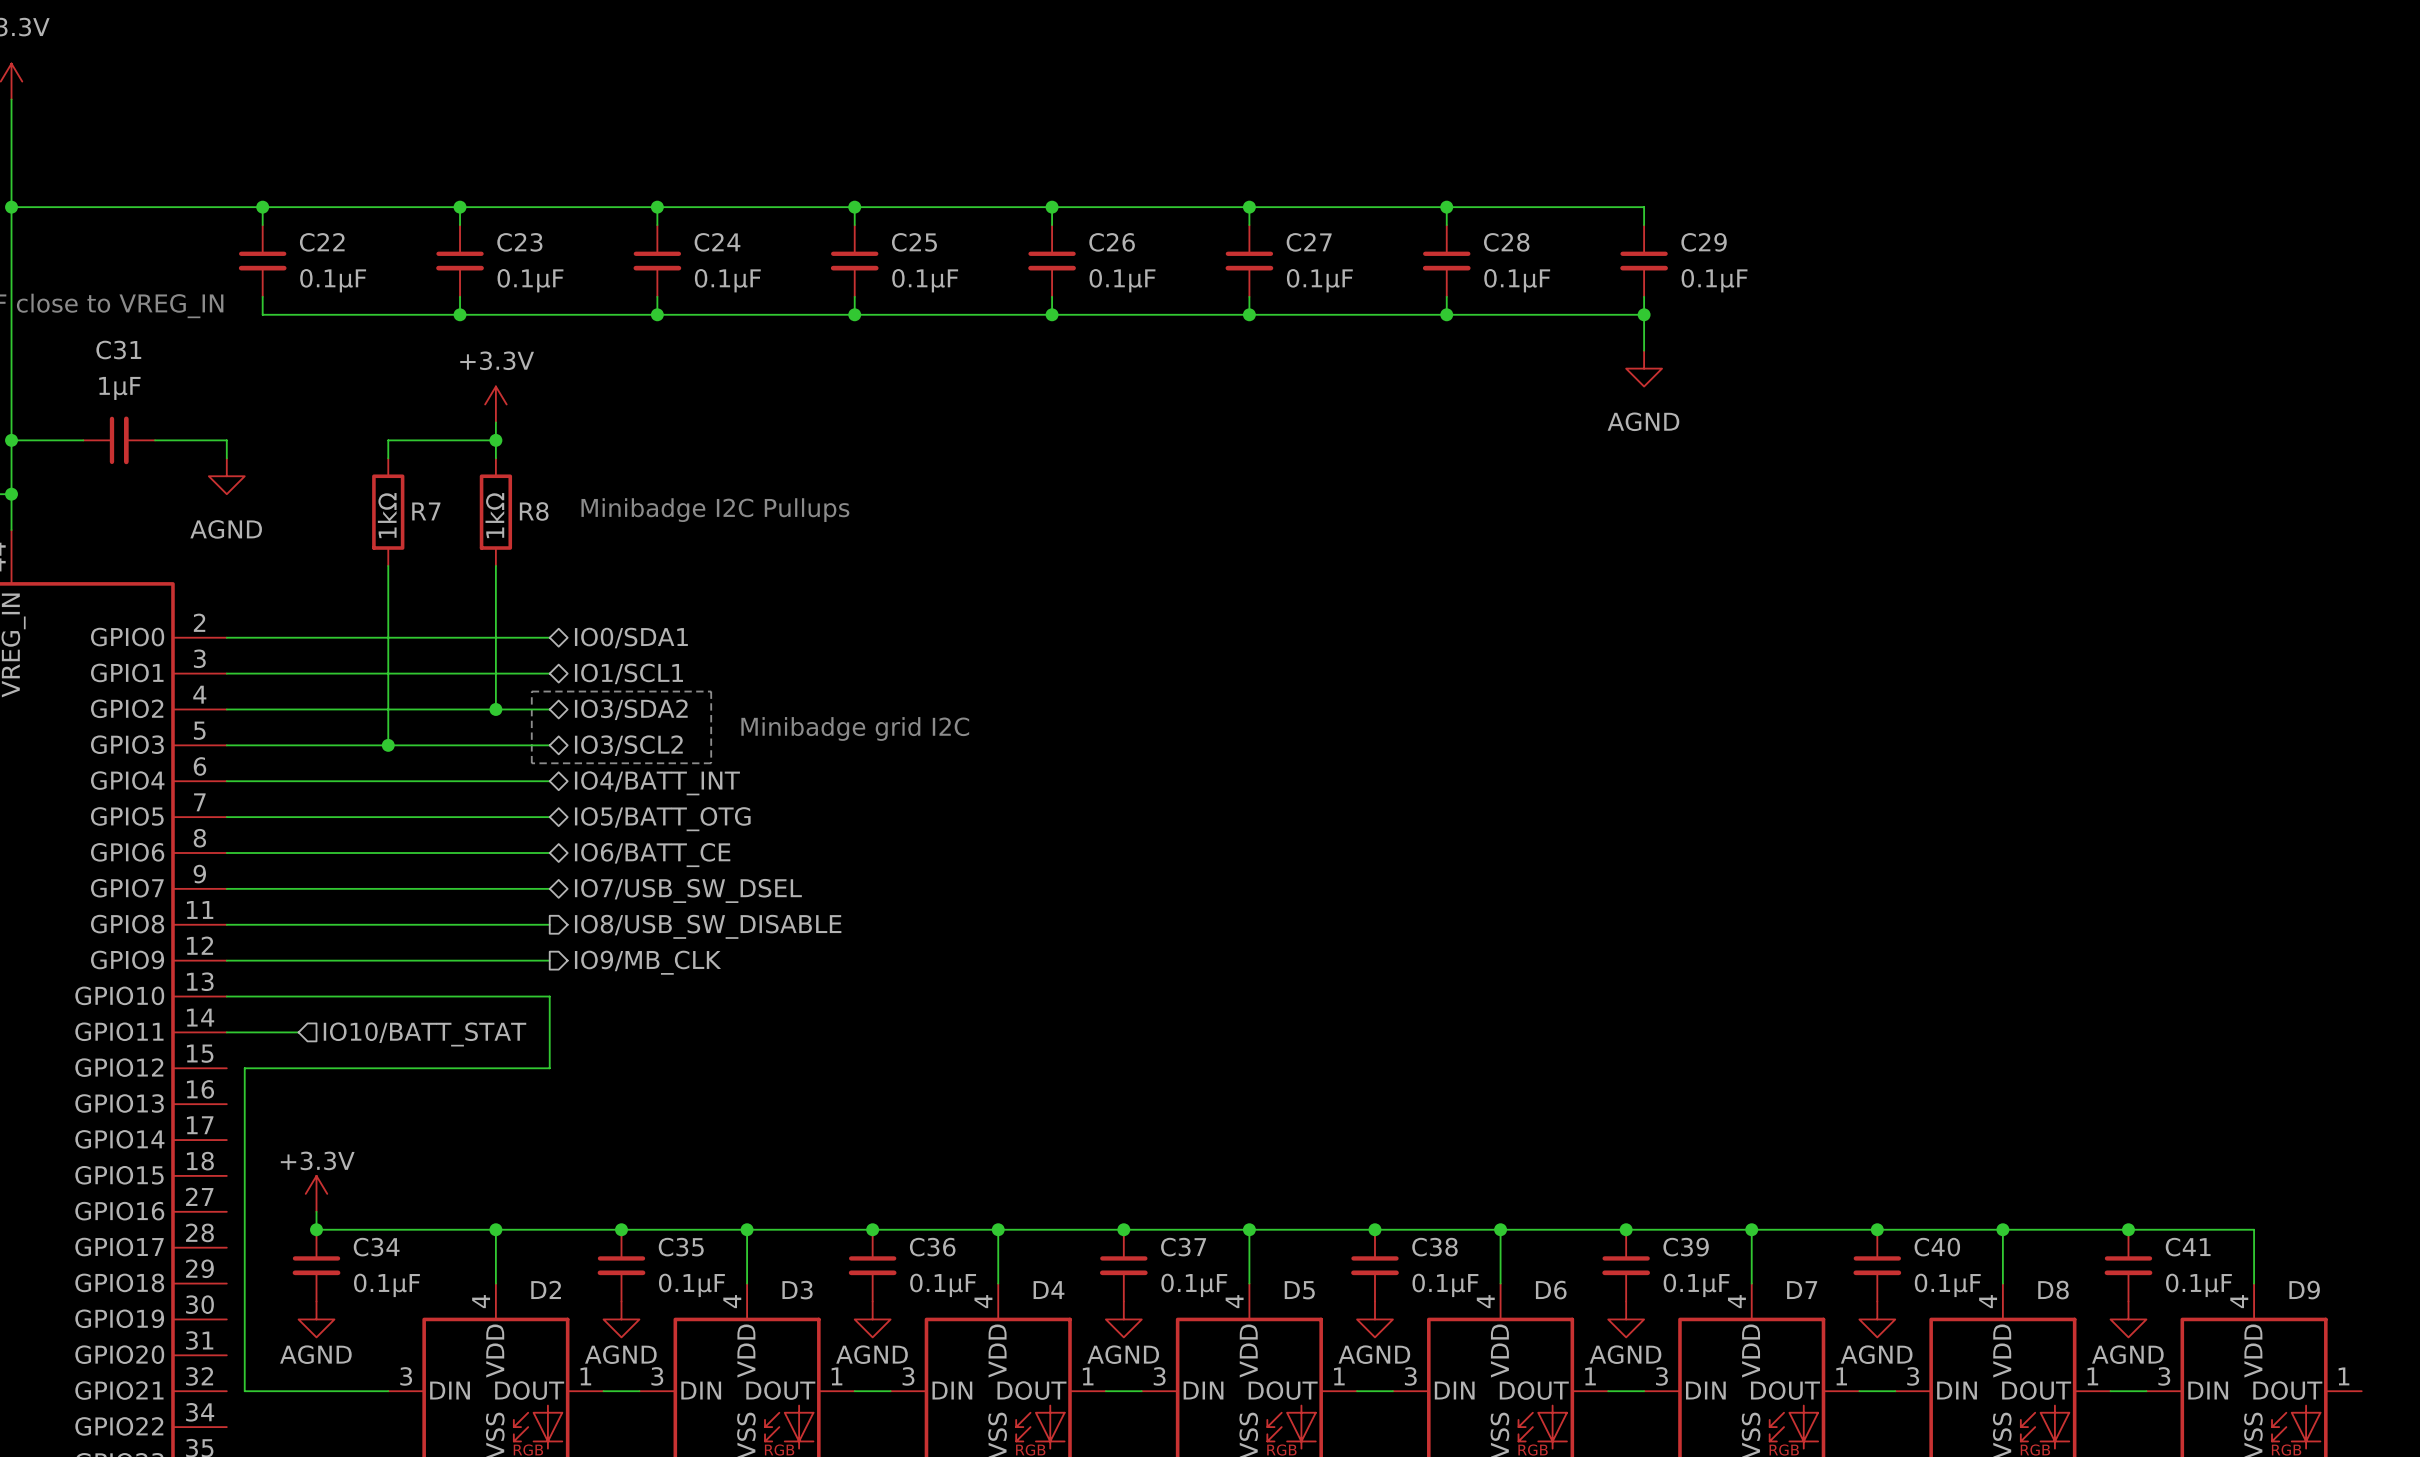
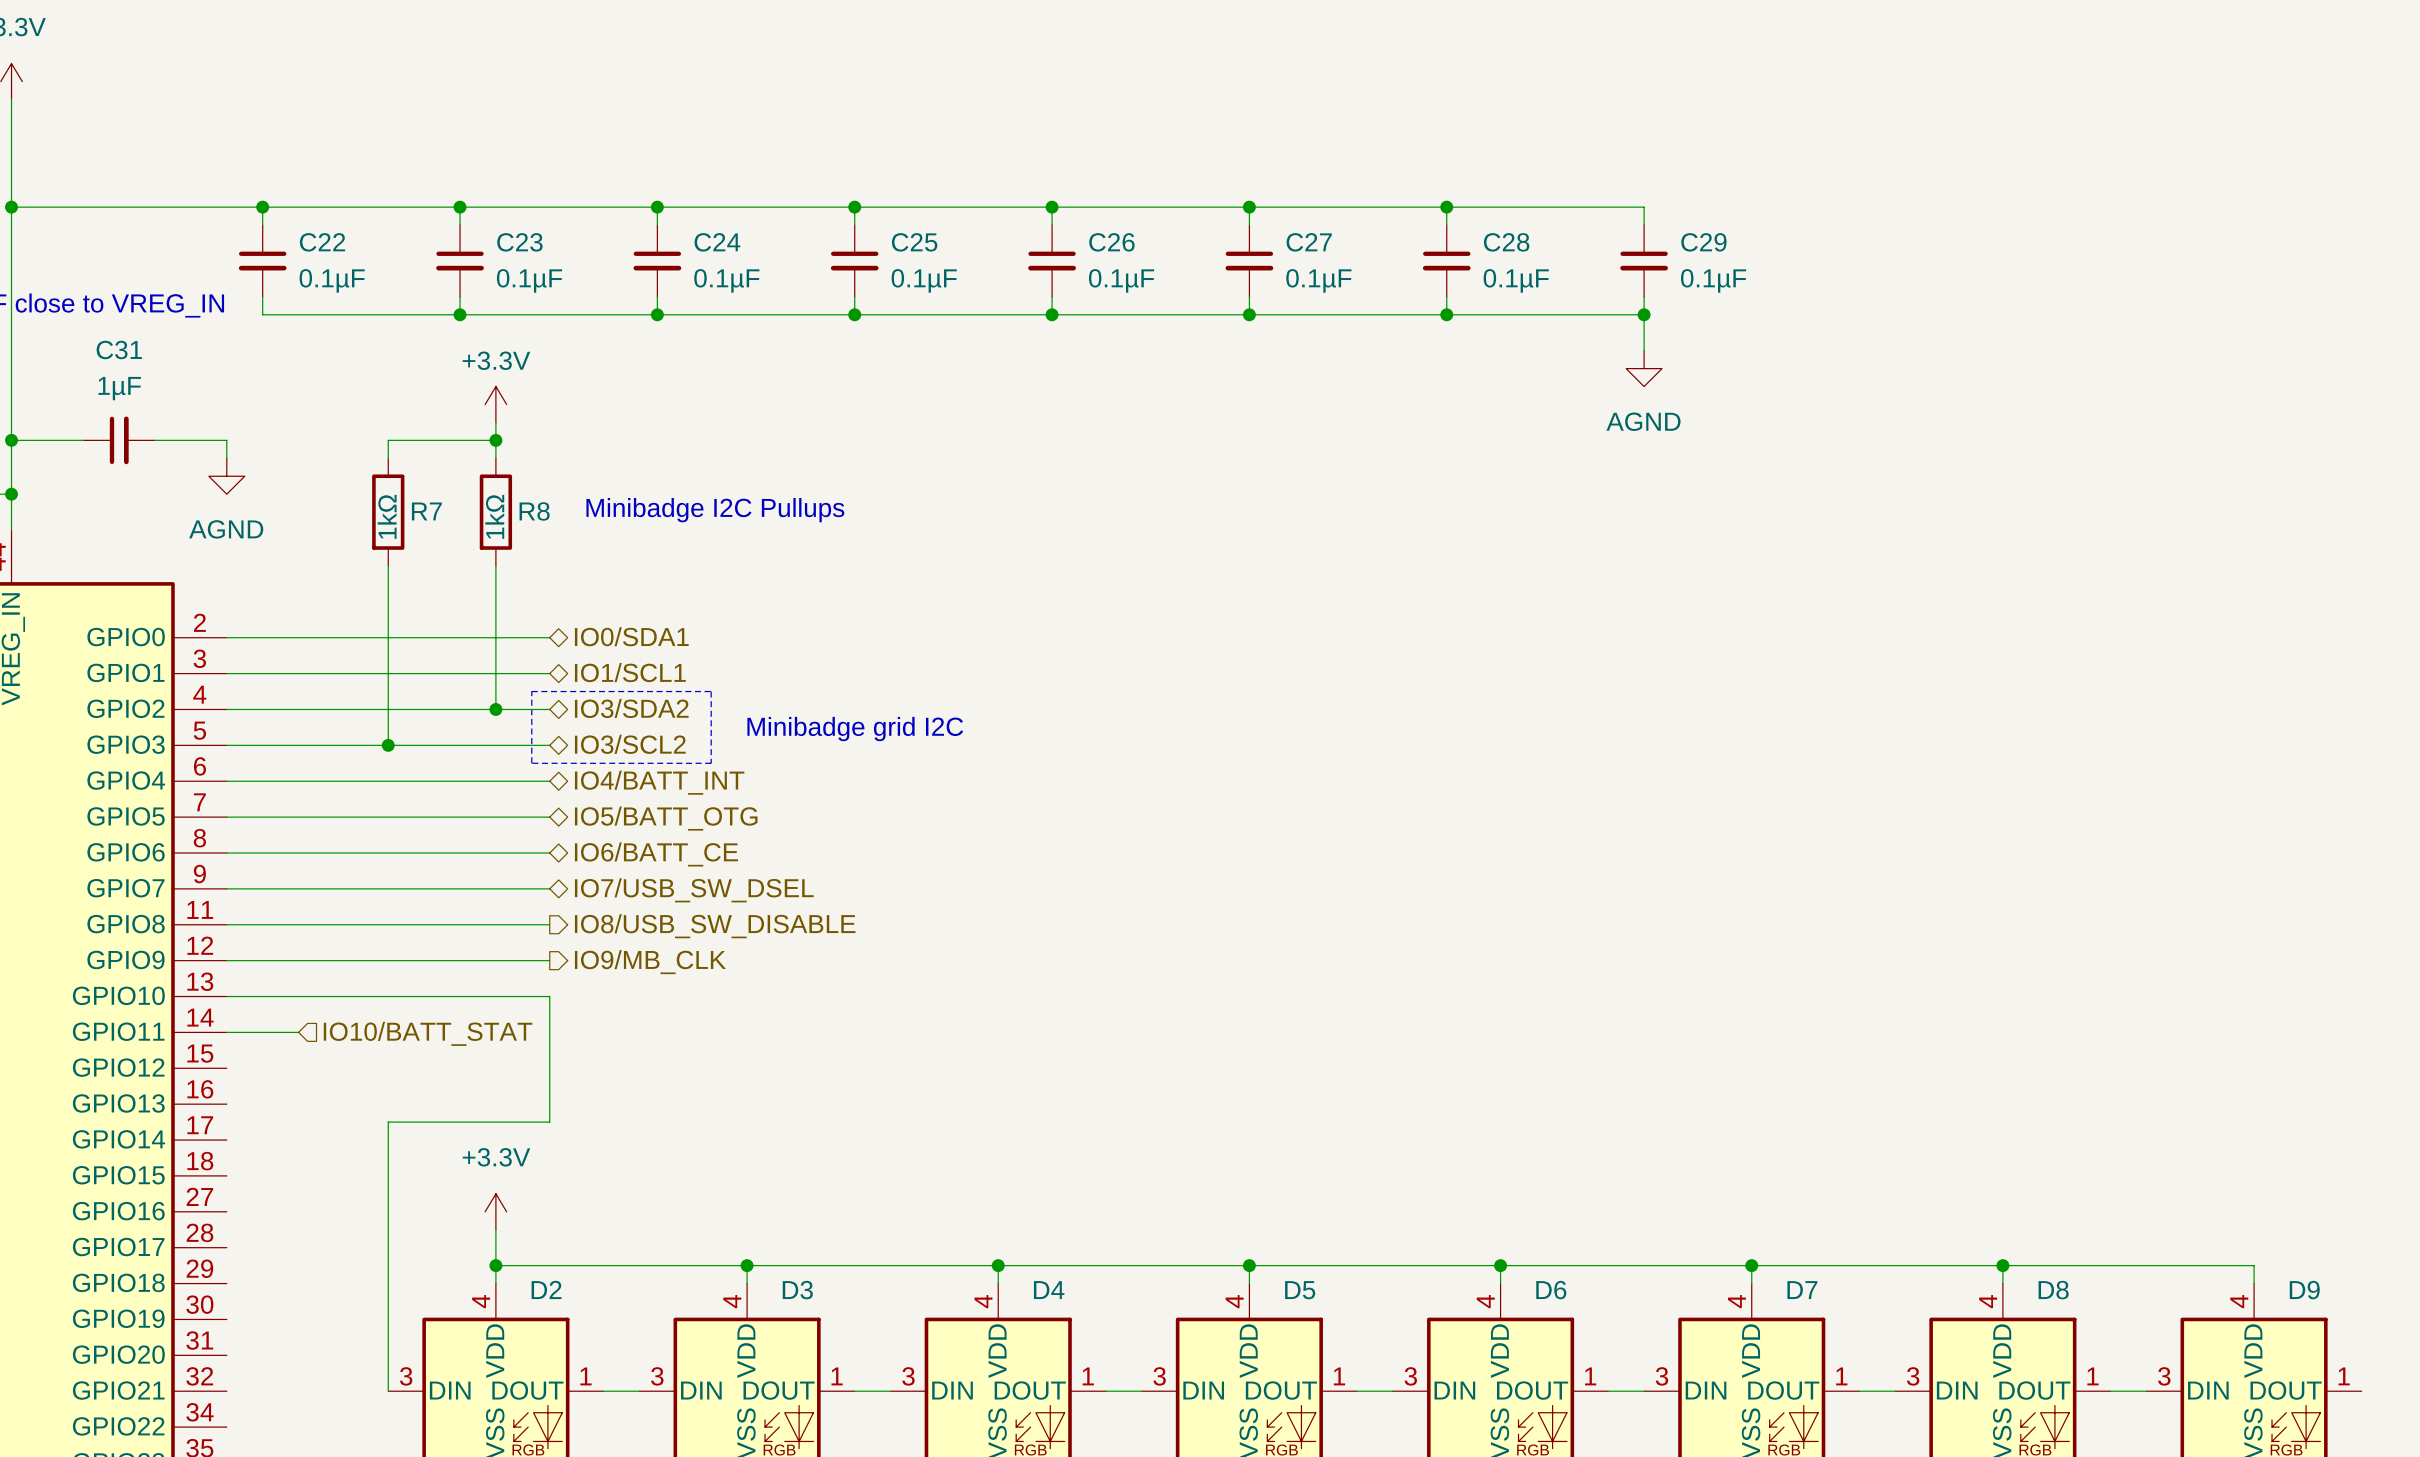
wire: (549, 1068) (244, 1068) (244, 1391) (388, 1391) -> (549, 1068) (549, 1122) (388, 1122) (388, 1391)
power symbol text position: +3.3V (317, 1160) -> +3.3V (496, 1157)
power symbol position: +3.3V (316, 1193) -> +3.3V (495, 1211)
wire: (316, 1211) (316, 1229) (2254, 1229) (2254, 1265) -> (495, 1265) (2254, 1265)
junction: (316, 1229) -> none
junction position: (495, 1229) -> (495, 1265)
junction: (621, 1229) -> none
wire: (747, 1229) (747, 1265) -> none
junction position: (747, 1229) -> (747, 1265)
junction: (872, 1229) -> none
wire: (998, 1229) (998, 1265) -> none
junction position: (998, 1229) -> (998, 1265)
junction: (1123, 1229) -> none
wire: (1249, 1229) (1249, 1265) -> none
junction position: (1249, 1229) -> (1249, 1265)
junction: (1374, 1229) -> none
wire: (1500, 1229) (1500, 1265) -> none
junction position: (1500, 1229) -> (1500, 1265)
junction: (1626, 1229) -> none
wire: (1751, 1229) (1751, 1265) -> none
junction position: (1751, 1229) -> (1751, 1265)
junction: (1877, 1229) -> none
wire: (2002, 1229) (2002, 1265) -> none
junction position: (2002, 1229) -> (2002, 1265)
junction: (2128, 1229) -> none
C34: 0.1μF (316, 1265) -> none
C35: 0.1μF (621, 1265) -> none
C36: 0.1μF (872, 1265) -> none
C37: 0.1μF (1123, 1265) -> none
C38: 0.1μF (1374, 1265) -> none
C39: 0.1μF (1626, 1265) -> none
C40: 0.1μF (1877, 1265) -> none
C41: 0.1μF (2128, 1265) -> none
power symbol: AGND (316, 1319) -> none
power symbol: AGND (621, 1319) -> none
power symbol: AGND (872, 1319) -> none
power symbol: AGND (1123, 1319) -> none
power symbol: AGND (1374, 1319) -> none
power symbol: AGND (1626, 1319) -> none
power symbol: AGND (1877, 1319) -> none
power symbol: AGND (2128, 1319) -> none

